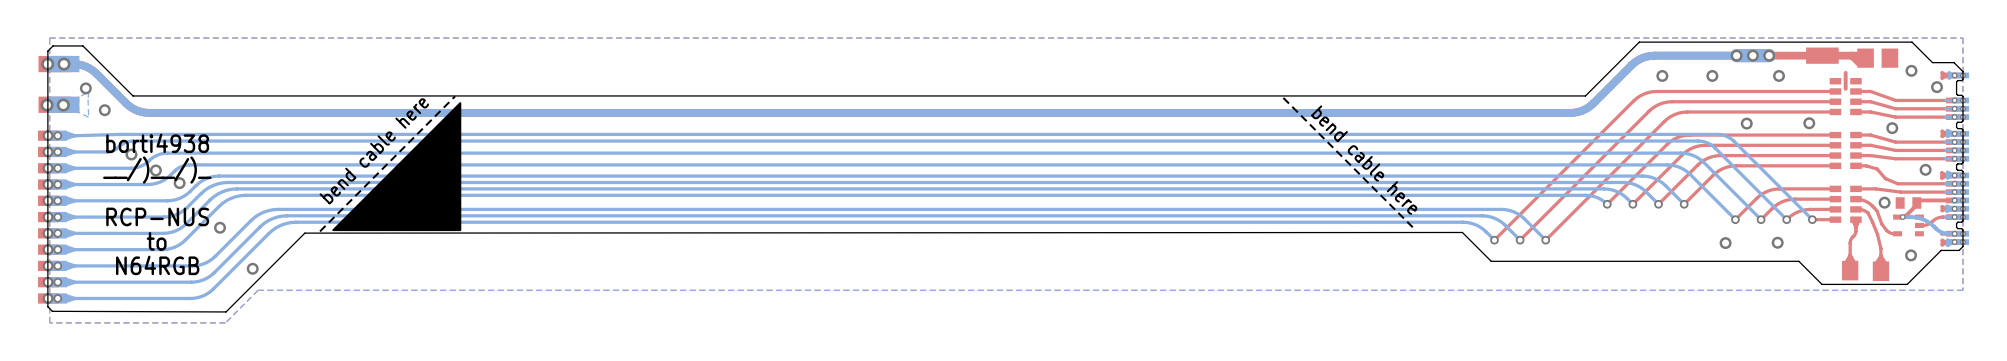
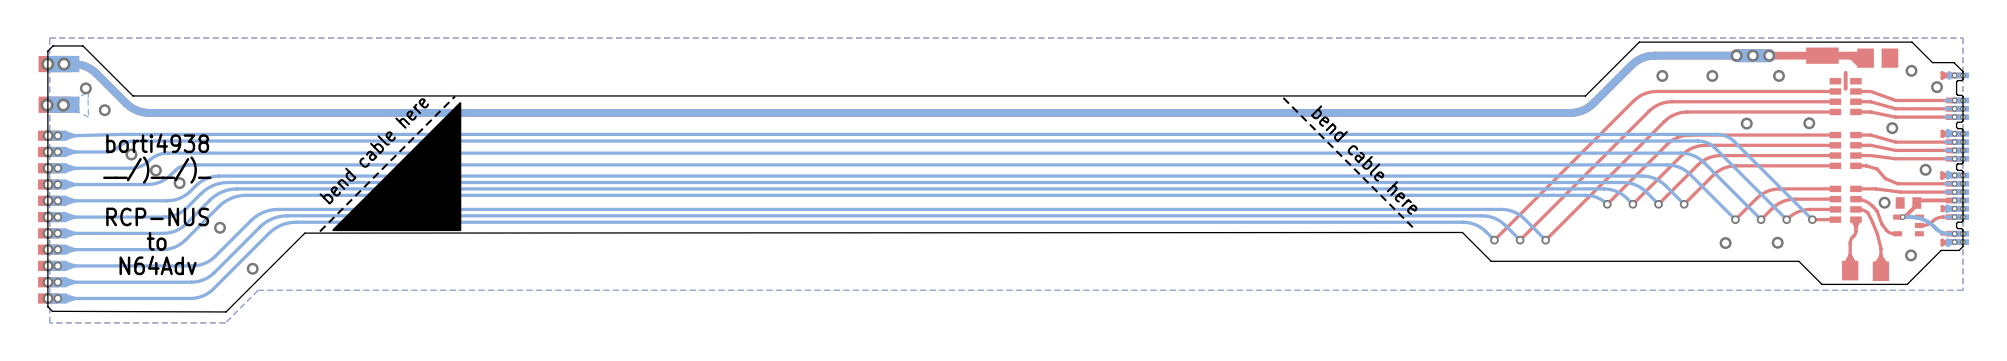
text: N64RGB (157, 265) -> N64Adv (158, 265)

